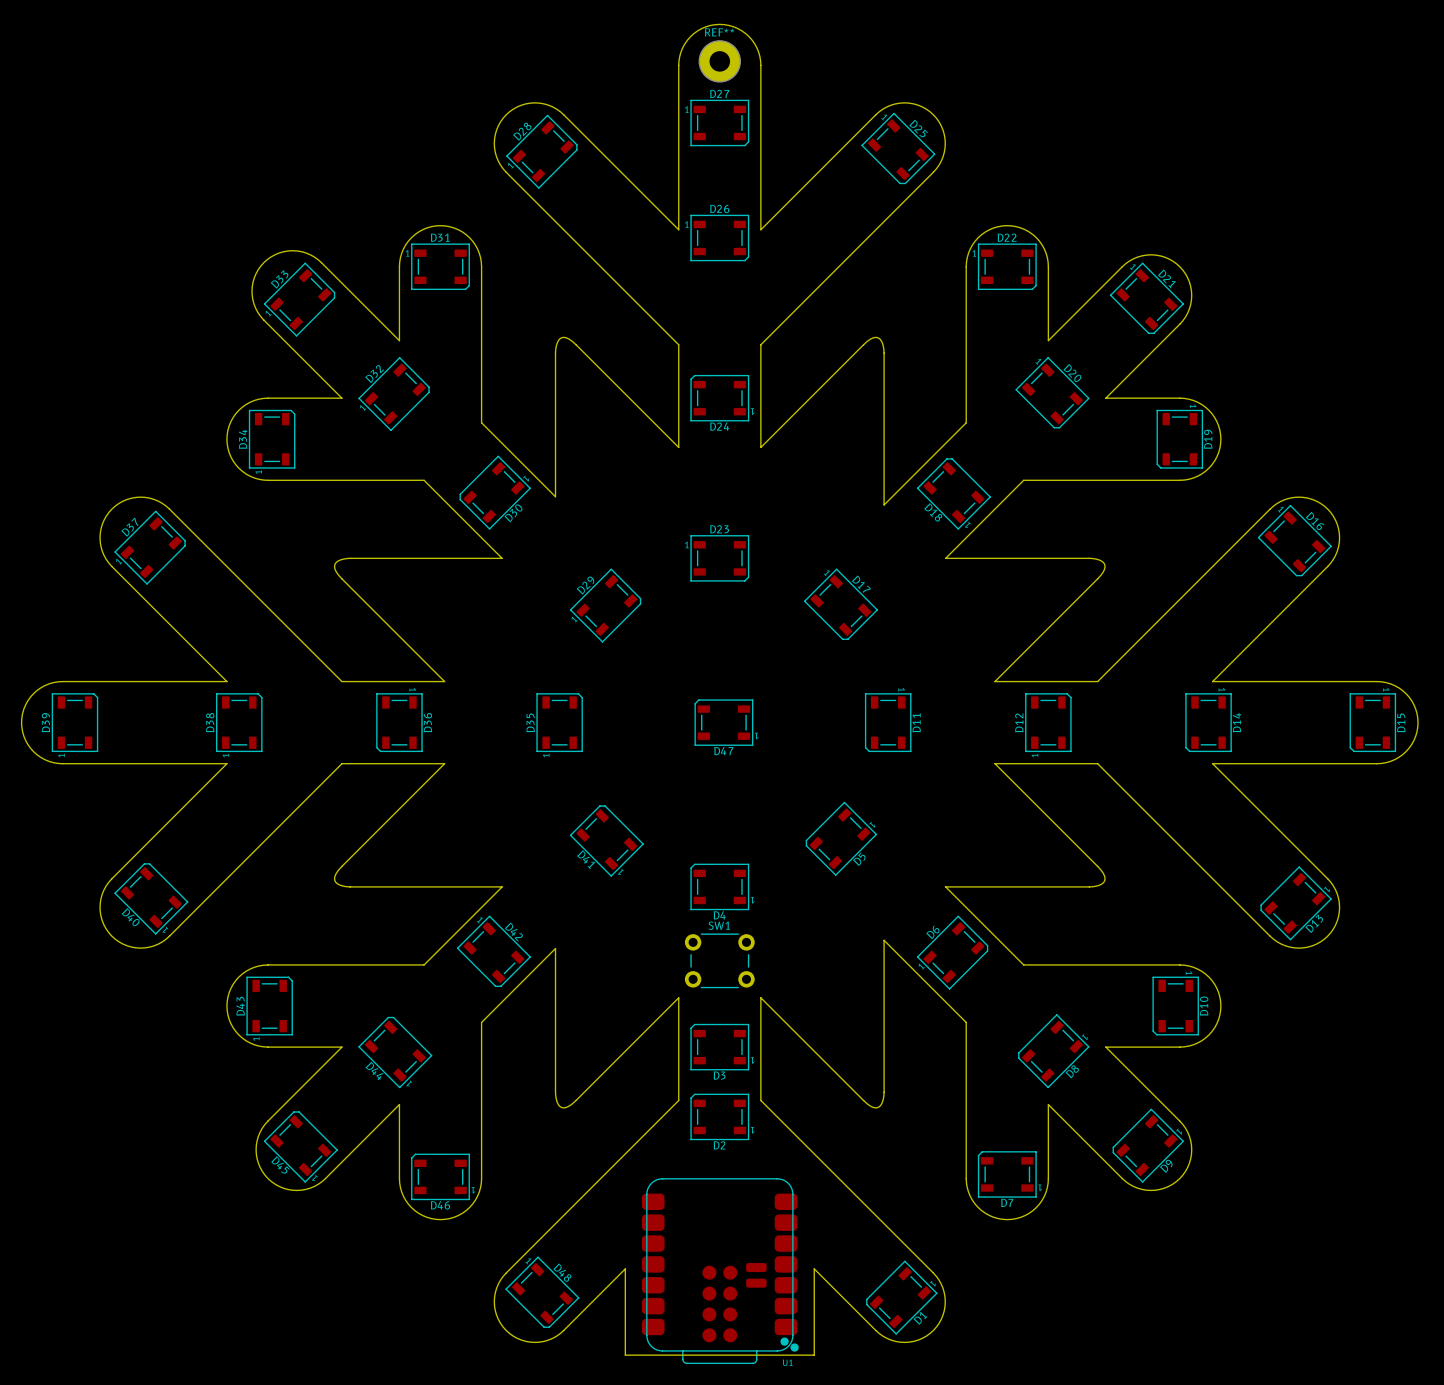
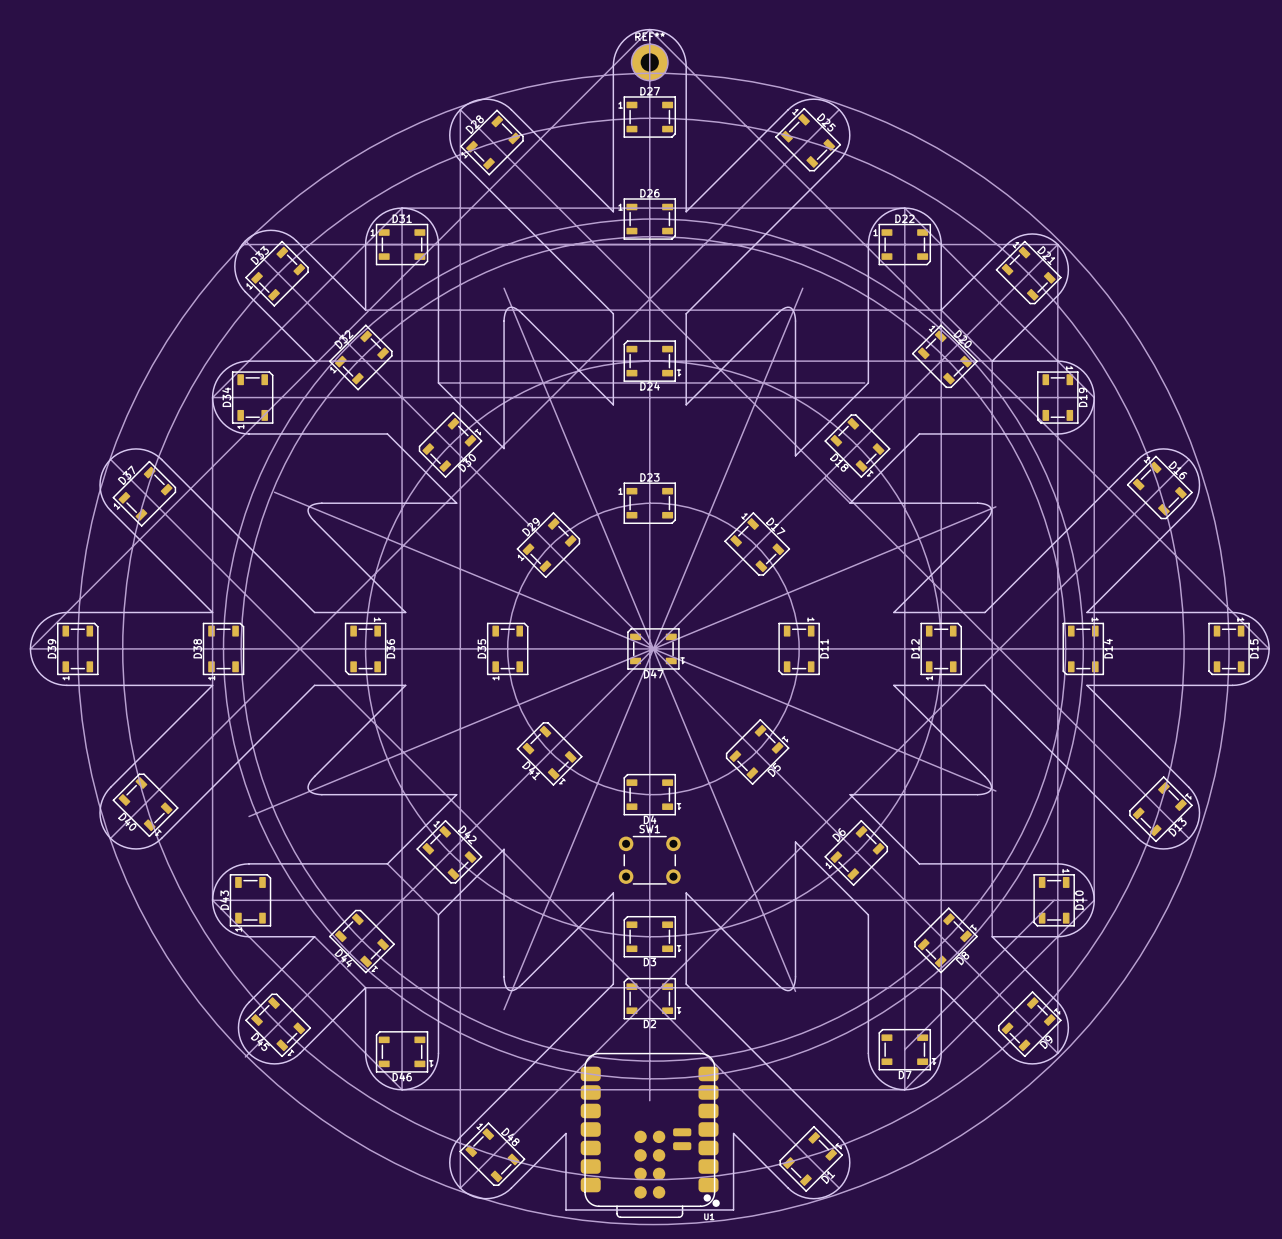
line: none -> (649, 29) (1269, 648) (30, 648) (649, 29)
line: none -> (649, 29) (649, 1100)
drawing: none -> [77, 72, 1230, 1225]
line: none -> (839, 109) (110, 838)
line: none -> (402, 208) (904, 208)
line: none -> (402, 208) (402, 1089)
line: none -> (402, 208) (212, 397)
line: none -> (904, 208) (904, 1089)
line: none -> (904, 208) (1094, 397) (1094, 900) (904, 1089)
line: none -> (245, 240) (1057, 1053) (1057, 244)
line: none -> (242, 244) (1057, 244)
line: none -> (1057, 244) (245, 1056)
line: none -> (504, 288) (653, 648)
line: none -> (802, 288) (504, 1009)
line: none -> (365, 310) (941, 310)
line: none -> (941, 310) (941, 987) (365, 987) (314, 936)
line: none -> (941, 310) (992, 361)
line: none -> (314, 361) (992, 361)
line: none -> (992, 361) (992, 936)
line: none -> (438, 382) (864, 382)
line: none -> (212, 397) (212, 900)
line: none -> (212, 397) (1086, 397)
line: none -> (110, 459) (839, 1188)
line: none -> (1188, 459) (460, 1188) (460, 109) (1188, 838)
line: none -> (824, 477) (850, 503)
line: none -> (274, 492) (653, 648)
line: none -> (995, 506) (653, 648)
line: none -> (653, 648) (249, 816)
line: none -> (653, 648) (995, 791)
line: none -> (653, 648) (795, 991)
line: none -> (387, 863) (438, 914)
line: none -> (212, 900) (402, 1089)
line: none -> (212, 900) (1086, 900)
line: none -> (1054, 900) (904, 1049)
line: none -> (402, 1089) (904, 1089)

